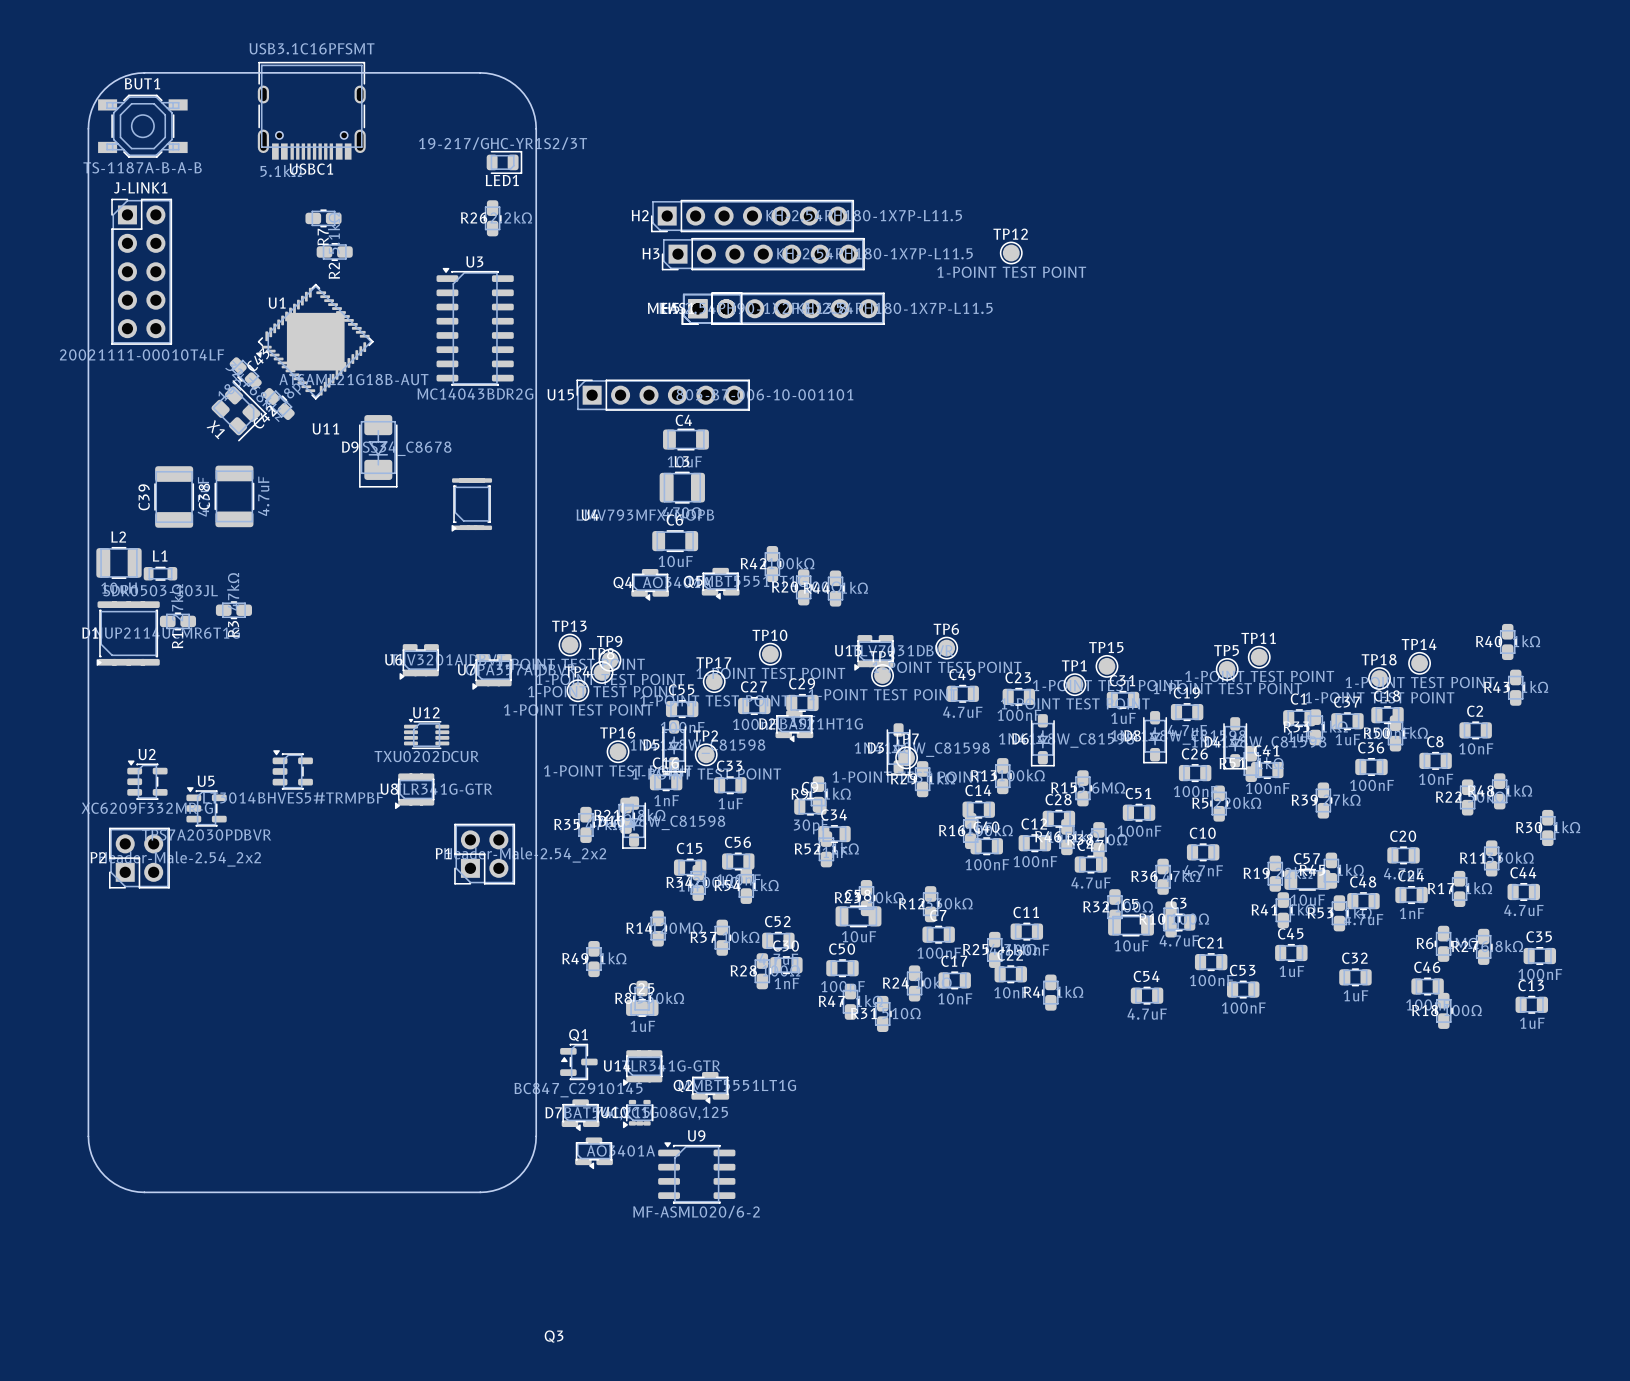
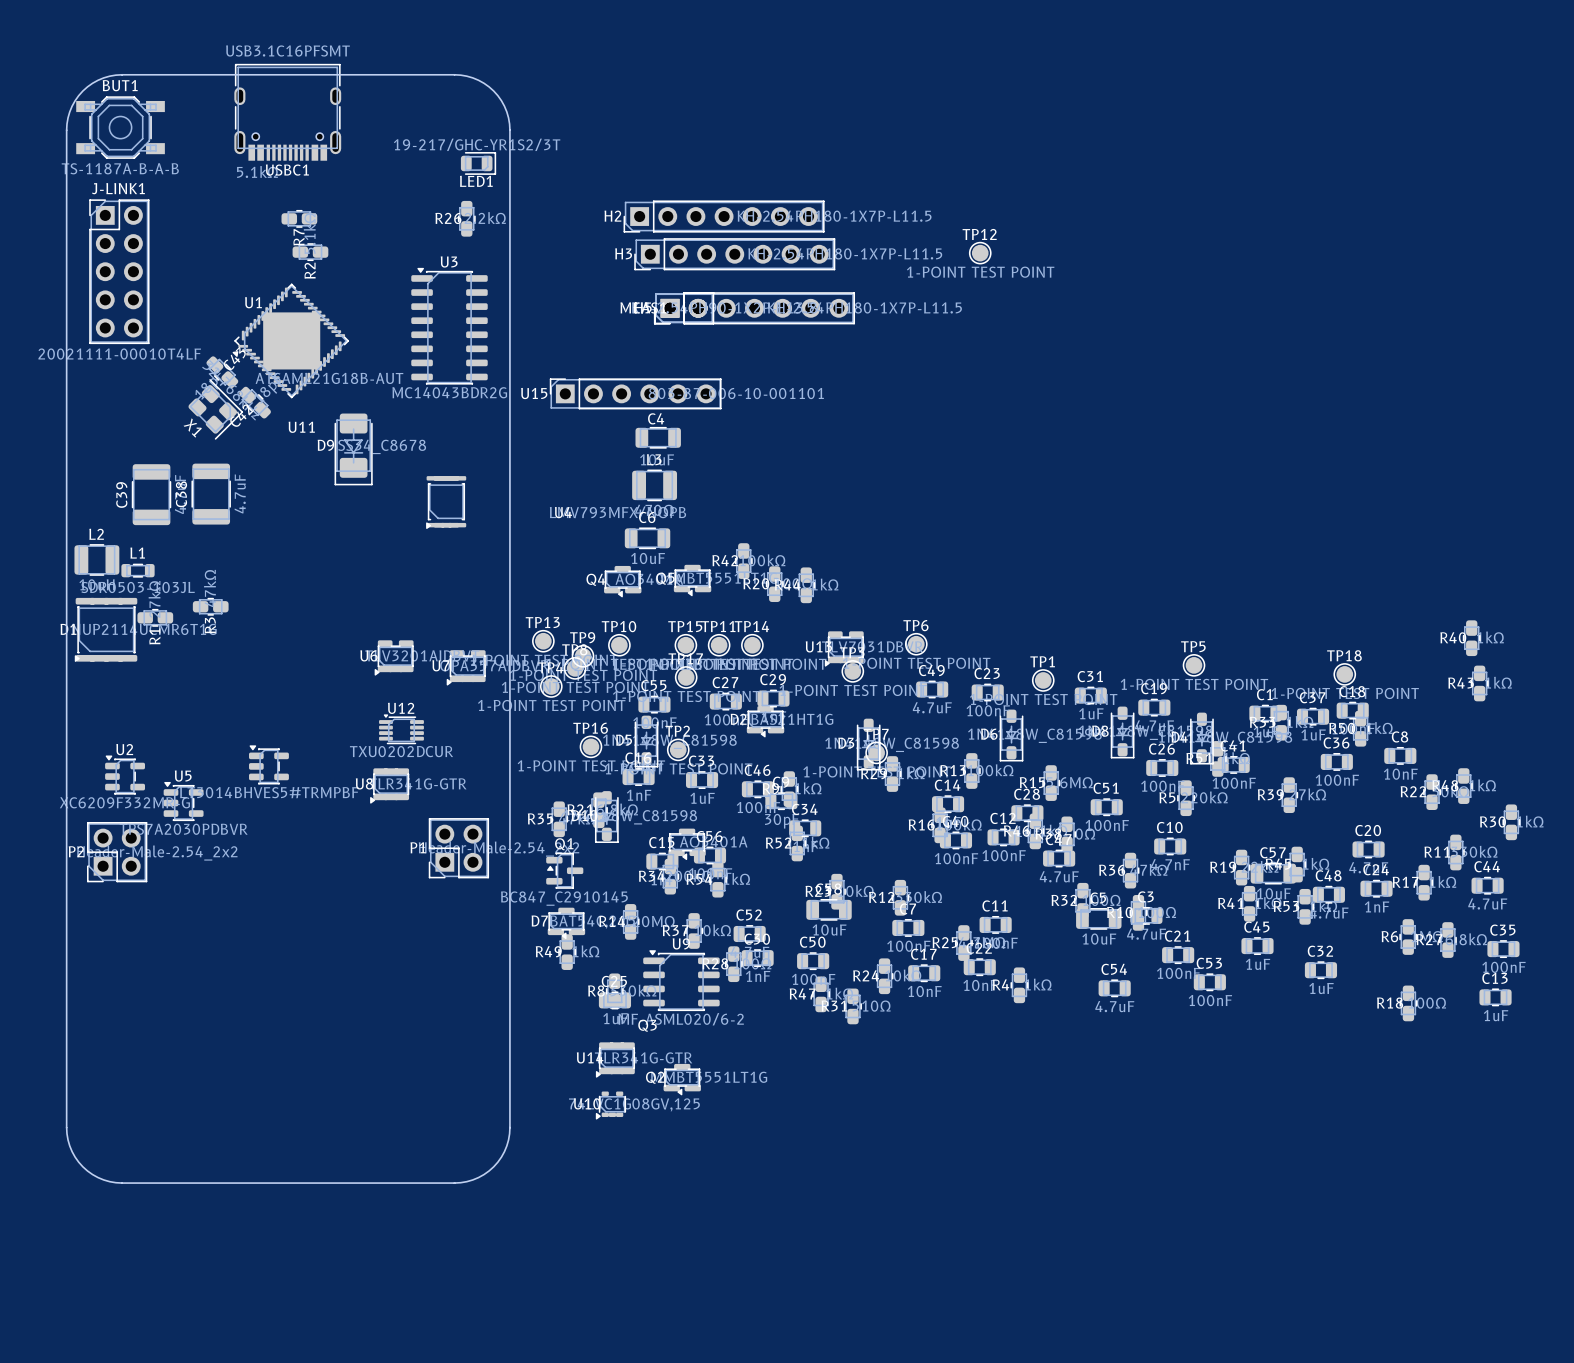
TP10 position: (770, 654) -> (619, 645)
TP11 position: (1259, 657) -> (719, 645)
TP14 position: (1419, 663) -> (752, 645)
TP15 position: (1106, 666) -> (685, 645)
C2: 10nF (1475, 730) -> none
C46 position: (1427, 986) -> (757, 789)
Q1 position: (578, 1061) -> (564, 870)
D7 position: (580, 1115) -> (566, 923)
Q3 position: (594, 1153) -> (687, 844)
U9 position: (696, 1172) -> (681, 980)

